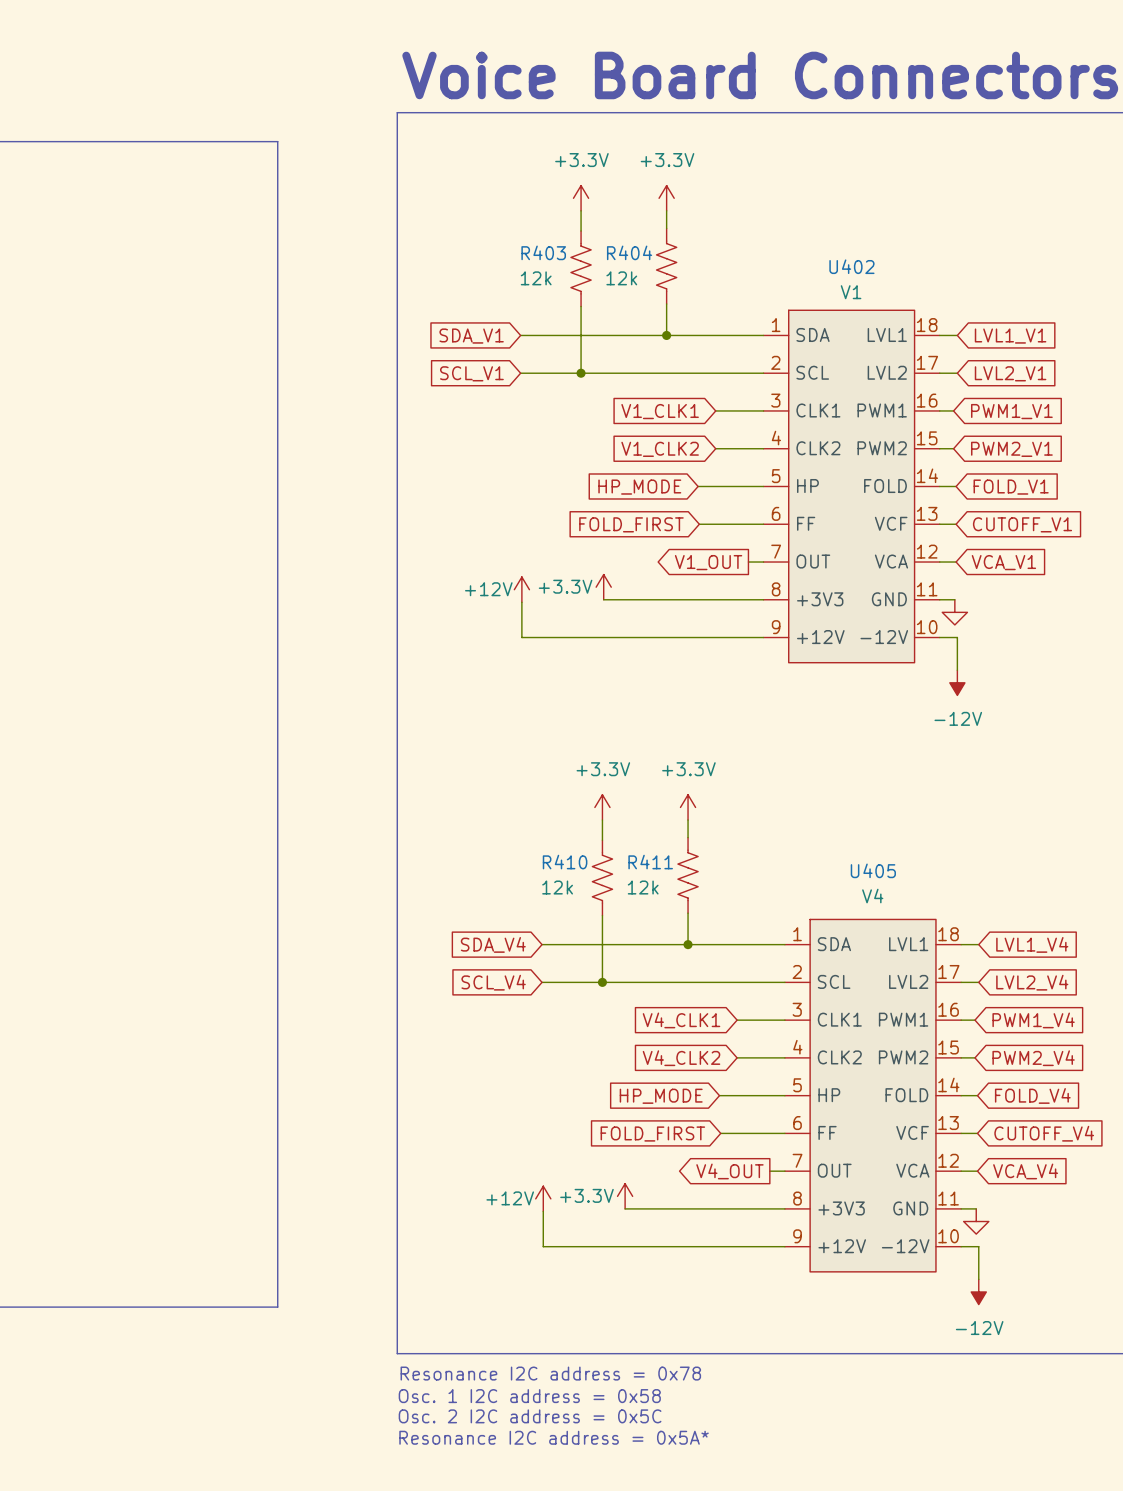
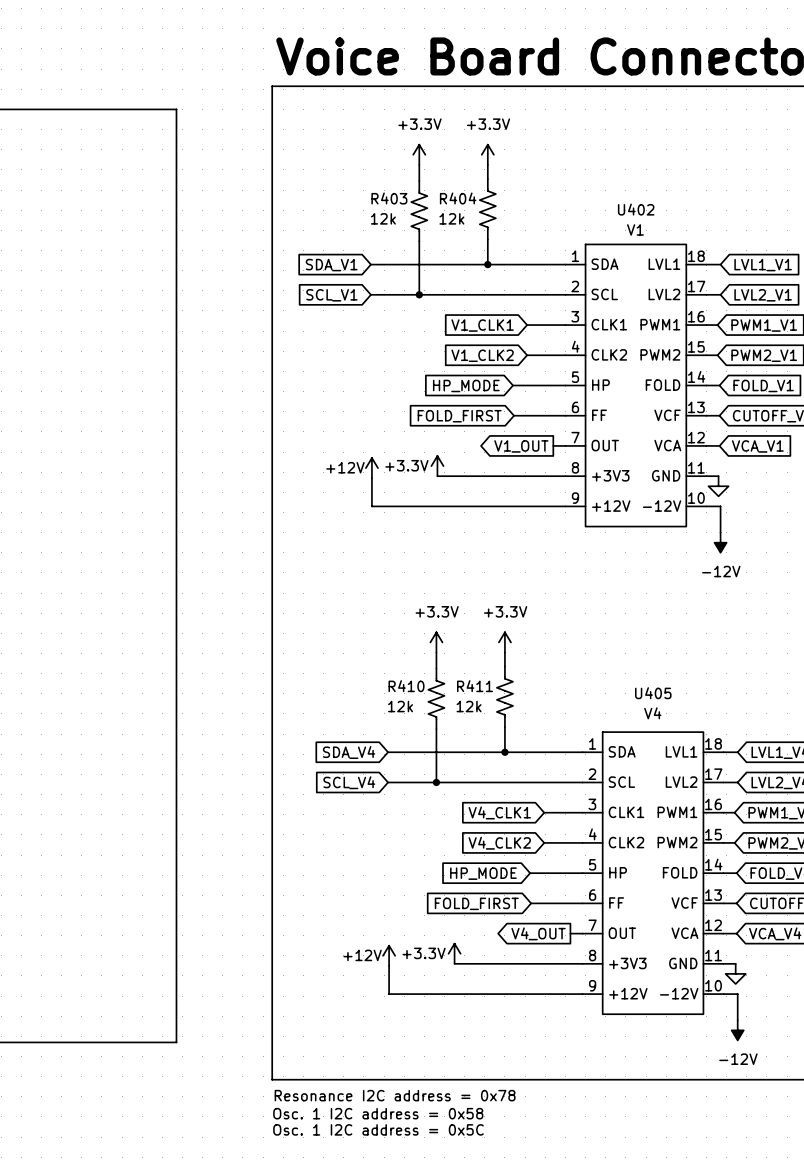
text: Osc. 2 I2C address = 0x5C (530, 1416) -> Osc. 1 I2C address = 0x5C (378, 1129)
text: Resonance I2C address = 0x5A* (554, 1437) -> none

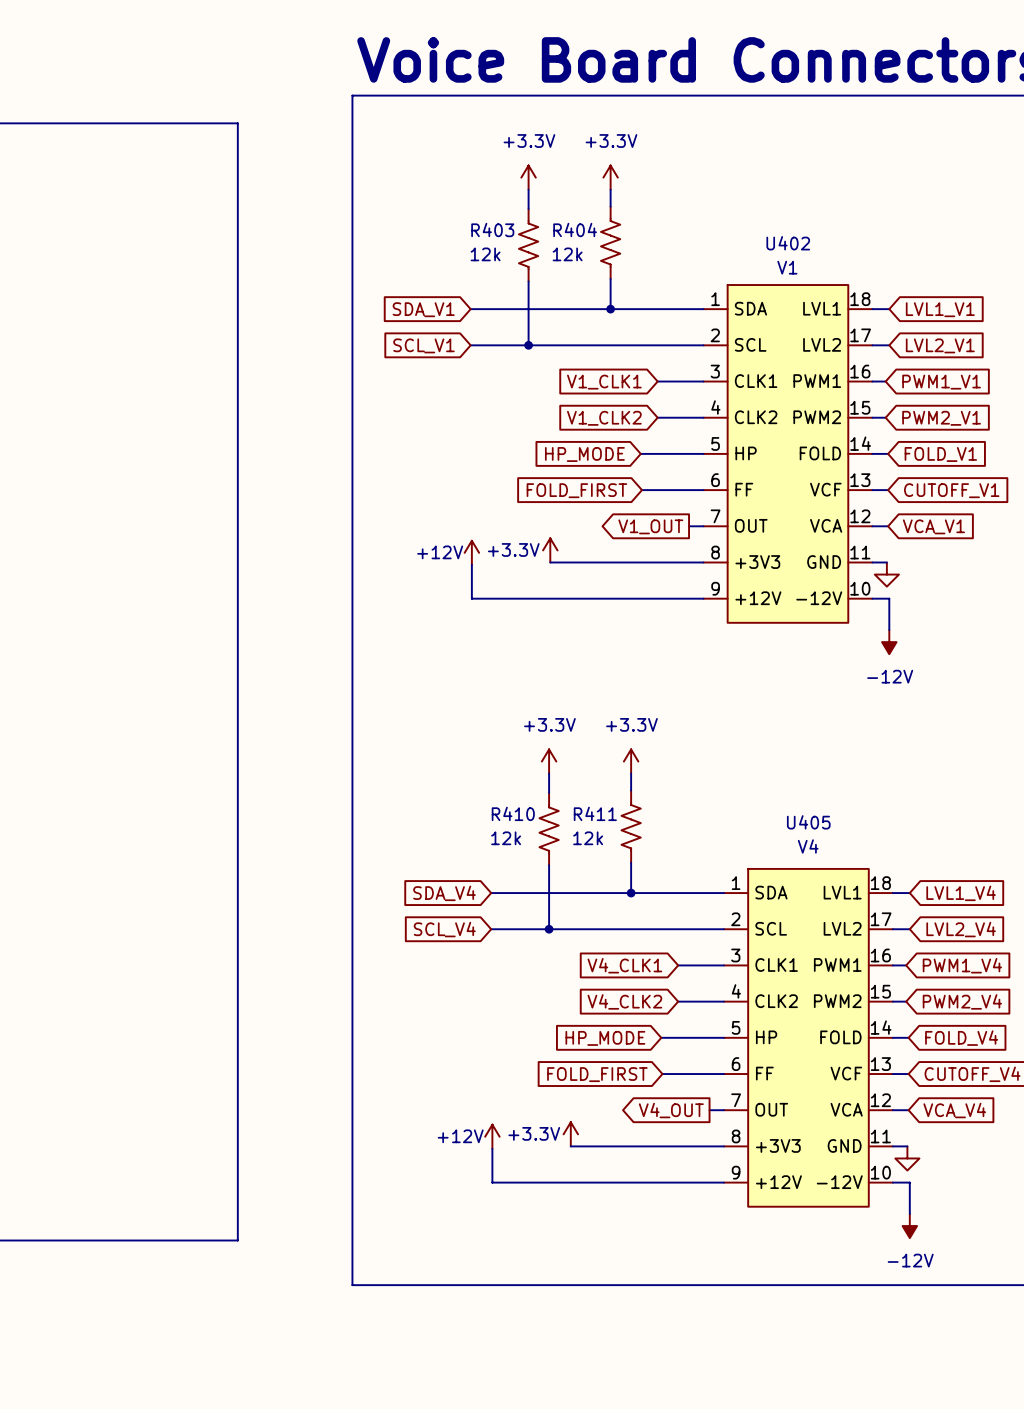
text: Resonance I2C address = 0x78 (395, 1095) -> none
text: Osc. 1 I2C address = 0x58 (378, 1113) -> none
text: Osc. 1 I2C address = 0x5C (378, 1129) -> none

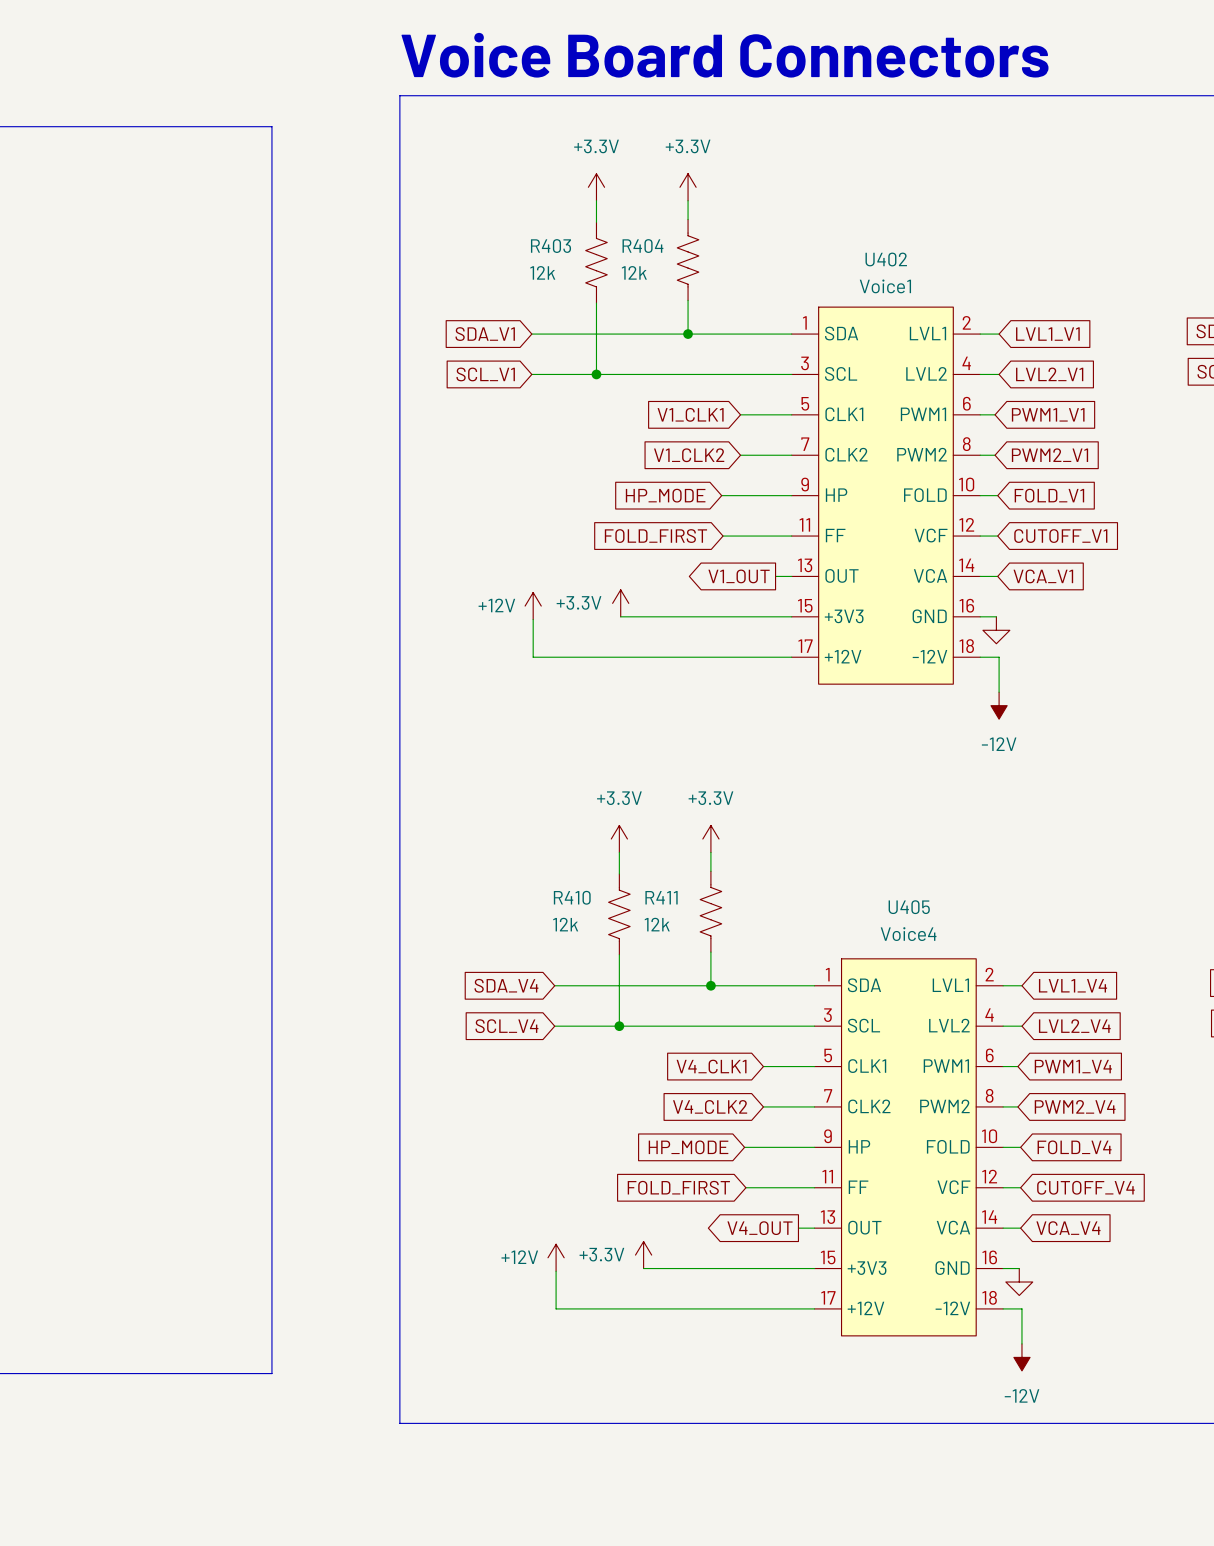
U402 value: V1 (787, 267) -> Voice1 (885, 286)
U402 symbol: [703, 285, 873, 623] -> [791, 307, 981, 685]
U405 value: V4 (808, 846) -> Voice4 (908, 934)
U405 symbol: [724, 868, 893, 1207] -> [814, 958, 1004, 1336]

